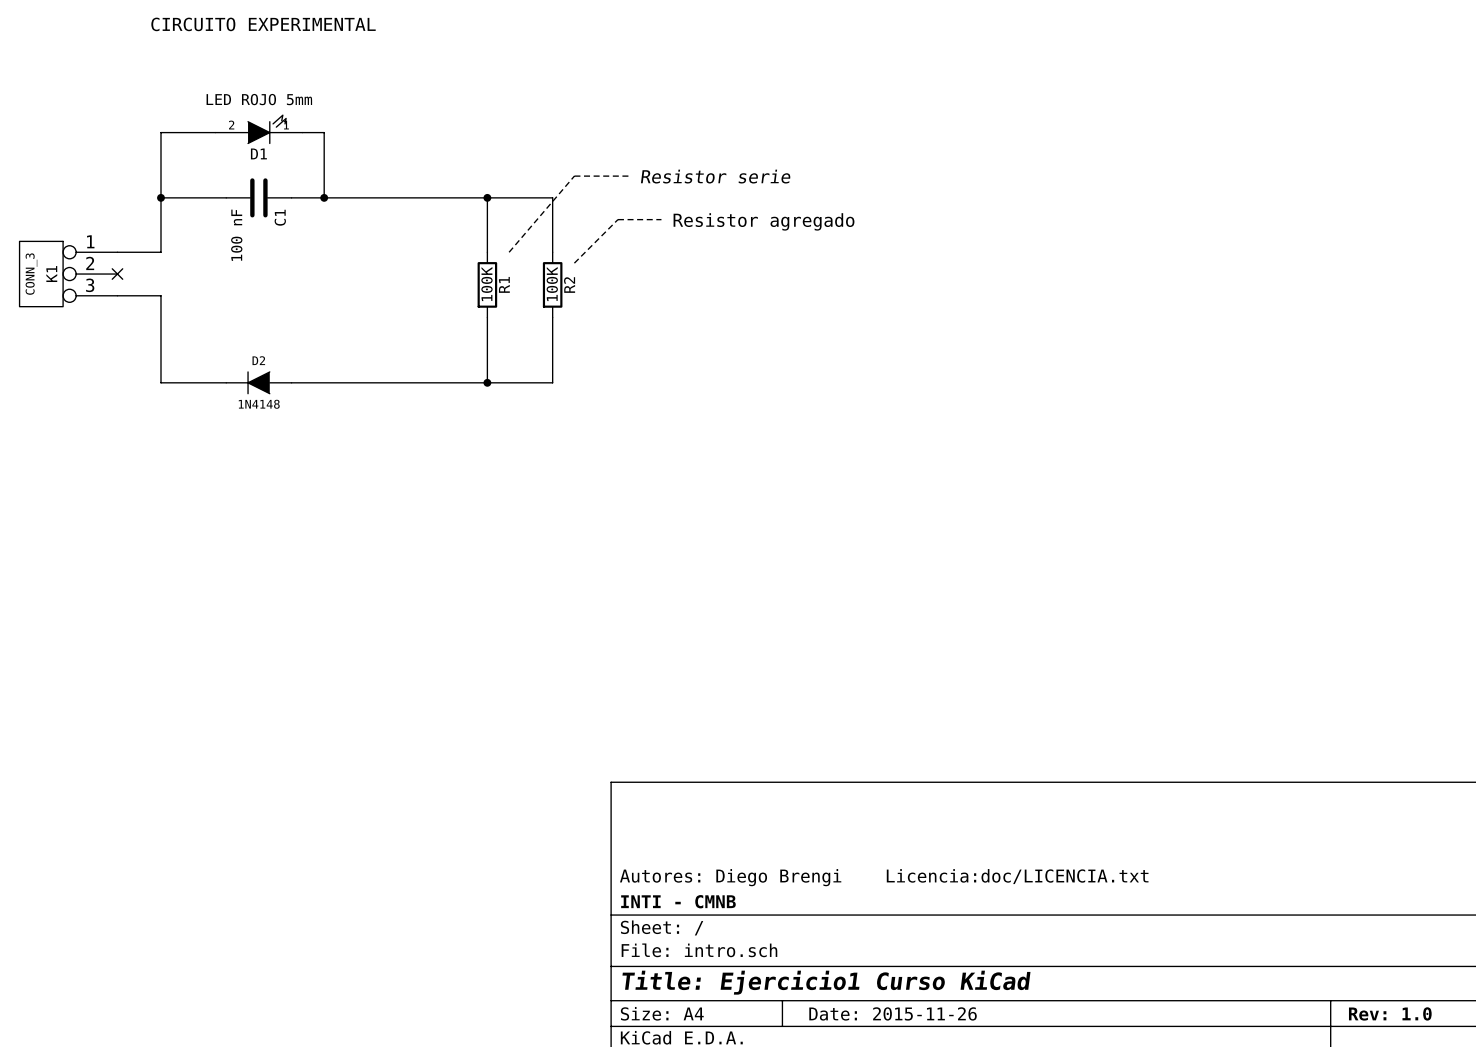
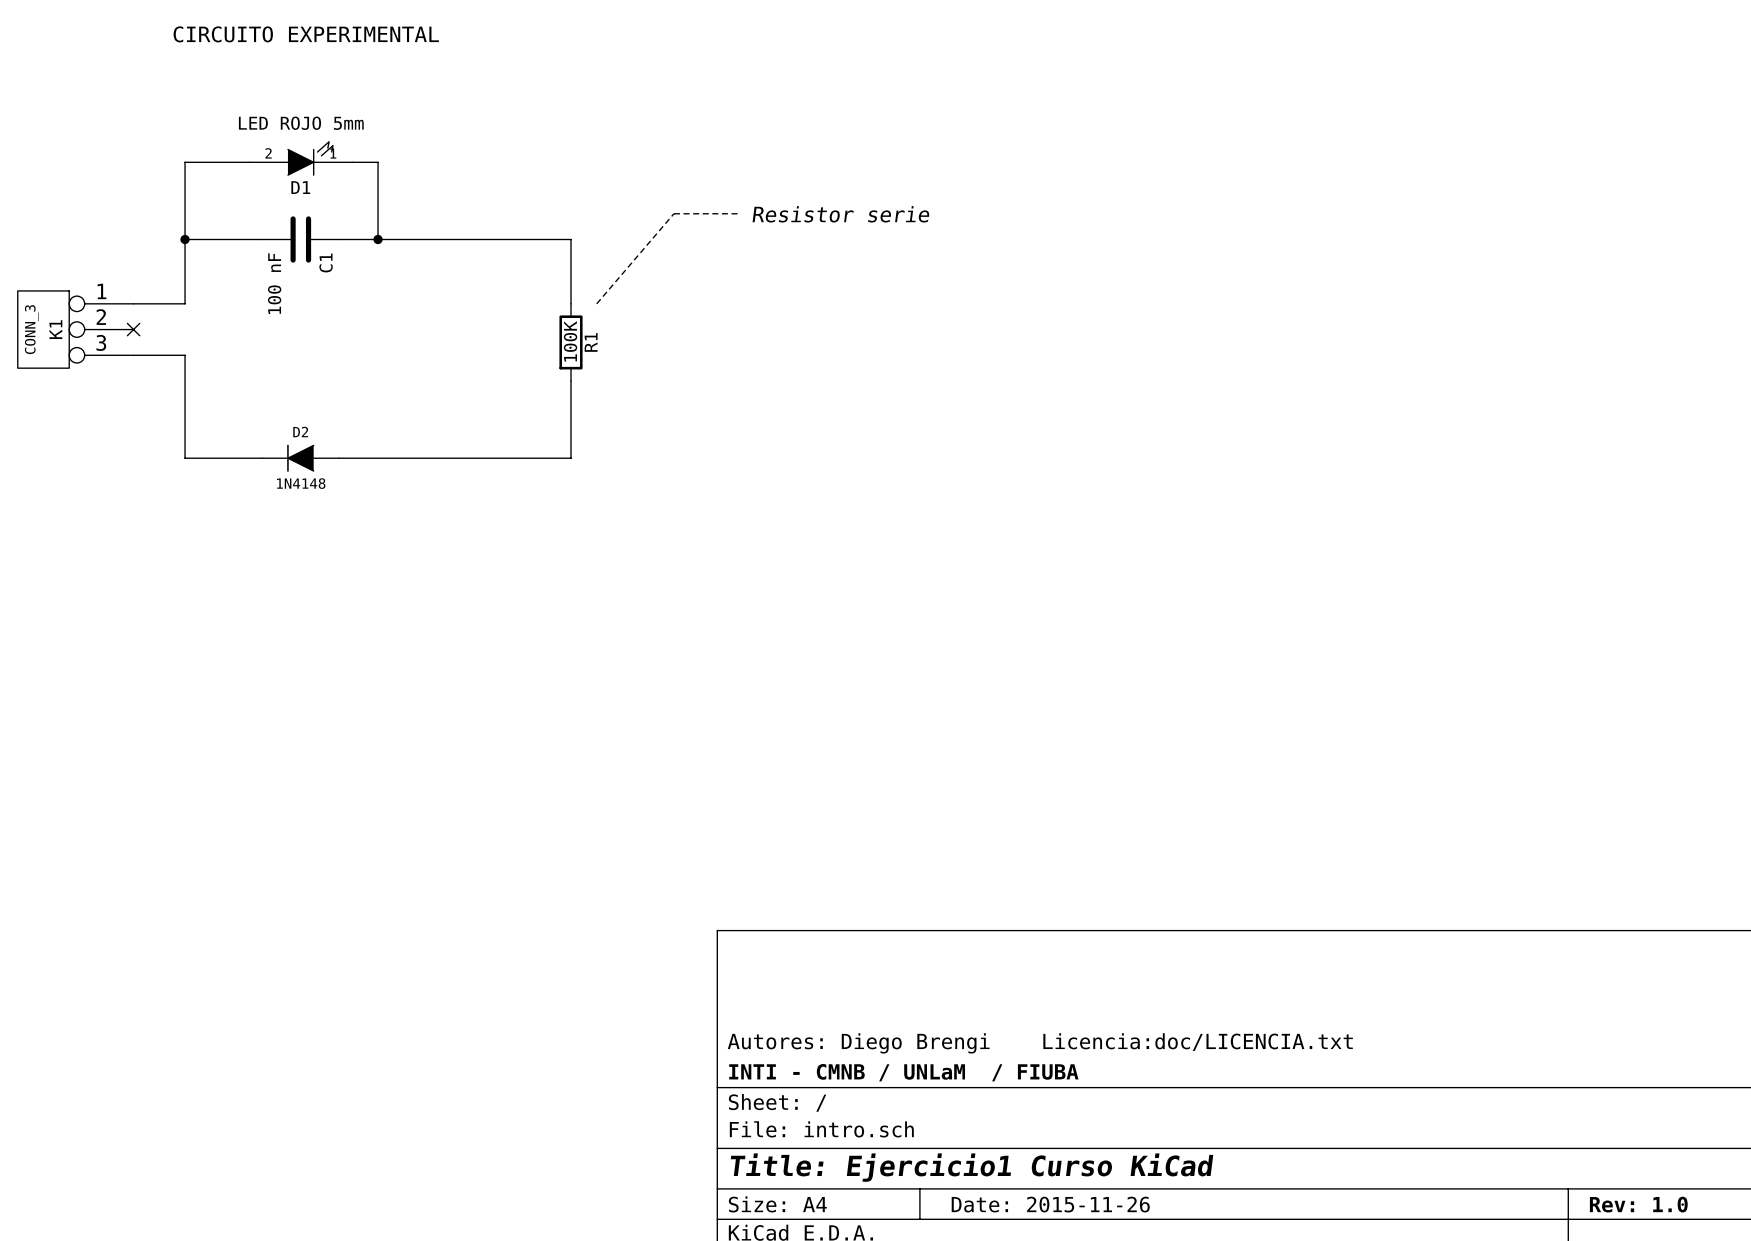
wire: (487, 197) (552, 197) (552, 252) -> none
junction: (487, 197) -> none
line: (661, 219) (617, 219) (574, 263) -> none
text: Resistor agregado (764, 221) -> none
R2: 100K (552, 284) -> none
wire: (552, 317) (552, 382) (487, 382) -> none
junction: (487, 382) -> none
title block: INTI - CMNB (678, 901) -> INTI - CMNB / UNLaM / FIUBA (903, 1072)

